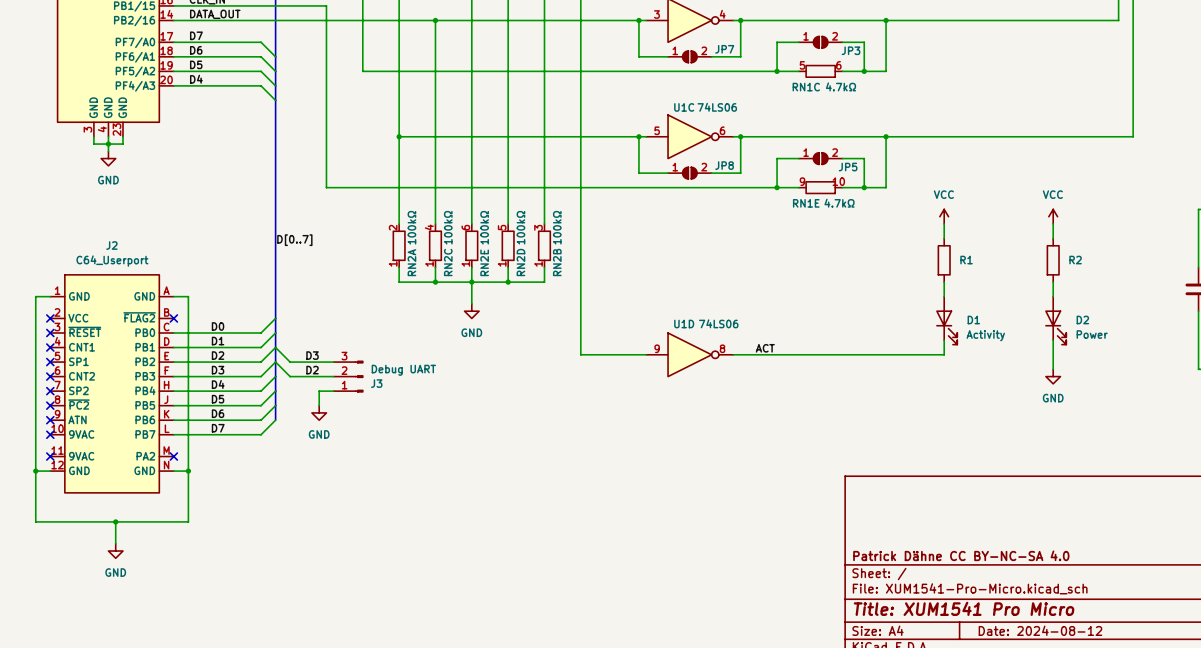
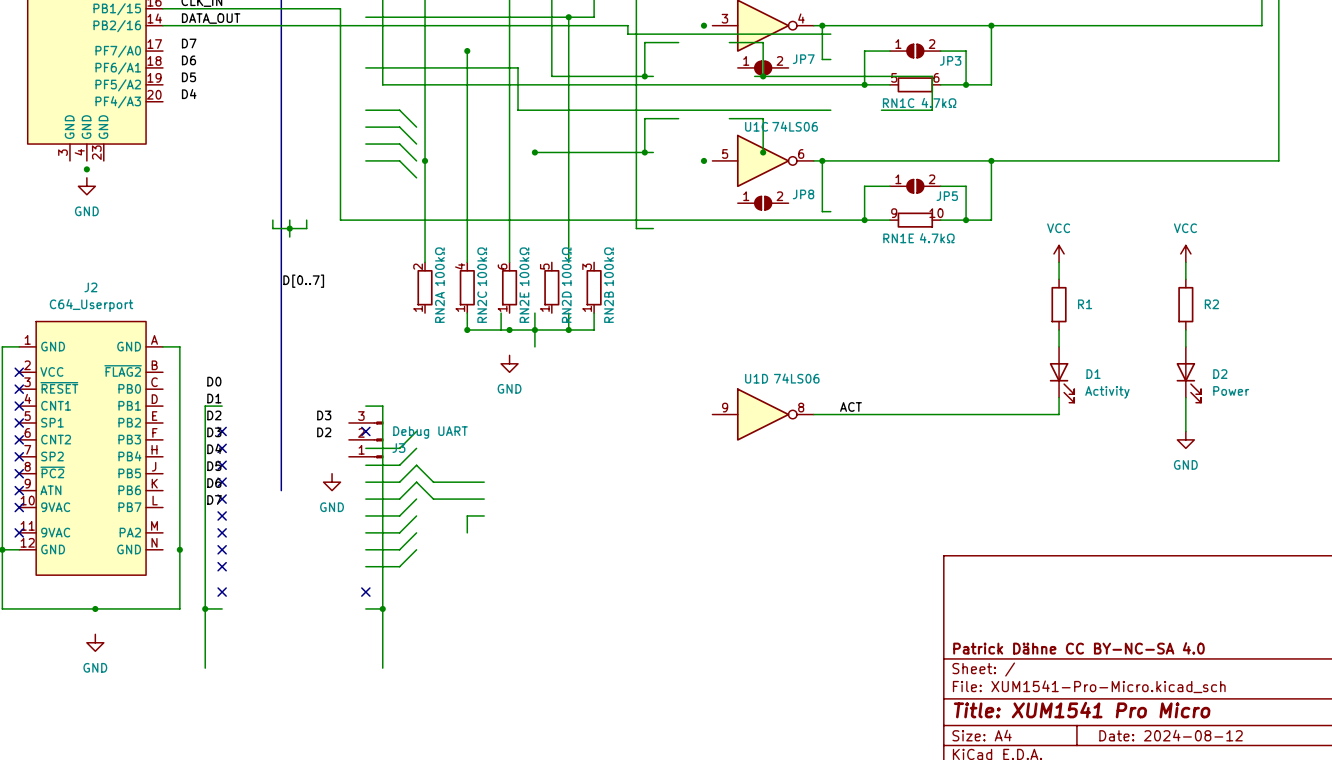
wire: none -> (568, 17) (568, 262)
junction: none -> (568, 17)
wire: (544, 13) (544, 223) -> (594, 17) (365, 17)
wire: (435, 20) (435, 42) -> none
junction position: (435, 20) -> (467, 51)
wire: (573, 20) (646, 20) -> (627, 25) (627, 34) (830, 34)
wire: (638, 20) (638, 56) (668, 56) -> none
wire: none -> (678, 42) (644, 42) (644, 76)
wire: none -> (729, 42) (763, 42) (763, 76)
wire: (173, 42) (261, 42) (275, 56) -> none
wire: (740, 49) (740, 56) (711, 56) -> (822, 59) (830, 59)
wire: (173, 56) (261, 56) (275, 71) -> none
wire: none -> (365, 67) (518, 67) (518, 110) (830, 110)
wire: (508, 64) (508, 223) -> (551, 76) (653, 76)
junction: none -> (644, 76)
wire: none -> (754, 76) (932, 76) (932, 110) (881, 110)
junction: none -> (763, 76)
wire: (173, 71) (261, 71) (275, 85) -> none
wire: (173, 85) (261, 85) (275, 100) -> none
wire: none -> (365, 110) (399, 110) (416, 127)
wire: none -> (678, 118) (644, 118) (644, 152)
wire: none -> (729, 118) (763, 118) (763, 152)
wire: none -> (365, 127) (399, 127) (416, 144)
wire: none -> (365, 144) (399, 144) (416, 160)
wire: none -> (534, 152) (653, 152)
junction: none -> (534, 152)
junction: none -> (644, 152)
junction: none -> (763, 152)
wire: (93, 136) (93, 144) (122, 144) (122, 136) -> none
wire: (108, 136) (108, 151) -> none
wire: none -> (365, 160) (399, 160) (416, 177)
wire: (399, 136) (646, 136) -> none
wire: (638, 136) (638, 173) (668, 173) -> none
wire: (711, 173) (740, 173) -> (830, 211) (822, 211) (822, 203)
wire: none -> (272, 220) (272, 228) (306, 228) (306, 220)
wire: none -> (289, 220) (289, 237)
junction: none -> (289, 228)
wire: (580, 194) (580, 354) (646, 354) -> (636, 228) (653, 228)
wire: (399, 267) (399, 282) (435, 282) -> none
wire: none -> (501, 313) (501, 330)
wire: (471, 267) (471, 303) -> none
wire: none -> (534, 313) (534, 346)
wire: (508, 267) (508, 282) -> (568, 313) (568, 330)
junction: none -> (534, 330)
junction: (508, 282) -> none
junction: none -> (568, 330)
no-connect mark: (173, 318) -> none
wire: (275, 318) (261, 332) (173, 332) -> none
wire: (275, 332) (261, 347) (224, 347) -> none
wire: (173, 347) (210, 347) -> (205, 668) (205, 406)
wire: none -> (365, 406) (382, 406) (382, 668)
wire: (173, 362) (261, 362) (275, 347) (290, 362) (333, 362) -> none
no-connect mark: none -> (222, 431)
no-connect mark: none -> (365, 431)
wire: none -> (416, 431) (399, 448) (365, 448)
wire: (173, 376) (261, 376) (275, 362) (290, 376) (333, 376) -> none
wire: (275, 376) (261, 391) (173, 391) -> none
no-connect mark: none -> (222, 448)
wire: none -> (416, 448) (399, 465) (365, 465)
wire: (275, 391) (261, 405) (173, 405) -> none
wire: (333, 391) (319, 391) (319, 405) -> (484, 515) (467, 515) (467, 532)
no-connect mark: none -> (222, 465)
wire: (275, 405) (261, 420) (173, 420) -> none
no-connect mark: none -> (222, 482)
wire: none -> (365, 482) (399, 482) (416, 465) (433, 482) (484, 482)
wire: (275, 420) (261, 434) (173, 434) -> none
no-connect mark: none -> (222, 499)
wire: none -> (365, 499) (399, 499) (416, 482) (433, 499) (484, 499)
wire: none -> (416, 499) (399, 515) (365, 515)
no-connect mark: none -> (222, 515)
wire: none -> (416, 515) (399, 532) (365, 532)
no-connect mark: (173, 456) -> none
no-connect mark: none -> (222, 532)
wire: none -> (416, 532) (399, 549) (365, 549)
wire: (173, 471) (188, 471) -> (205, 608) (222, 608)
no-connect mark: none -> (222, 549)
wire: none -> (416, 549) (399, 566) (365, 566)
no-connect mark: none -> (222, 566)
no-connect mark: none -> (222, 592)
no-connect mark: none -> (365, 592)
wire: (115, 521) (115, 543) -> none
junction: none -> (205, 608)
wire: none -> (365, 608) (382, 608)
junction: none -> (382, 608)

